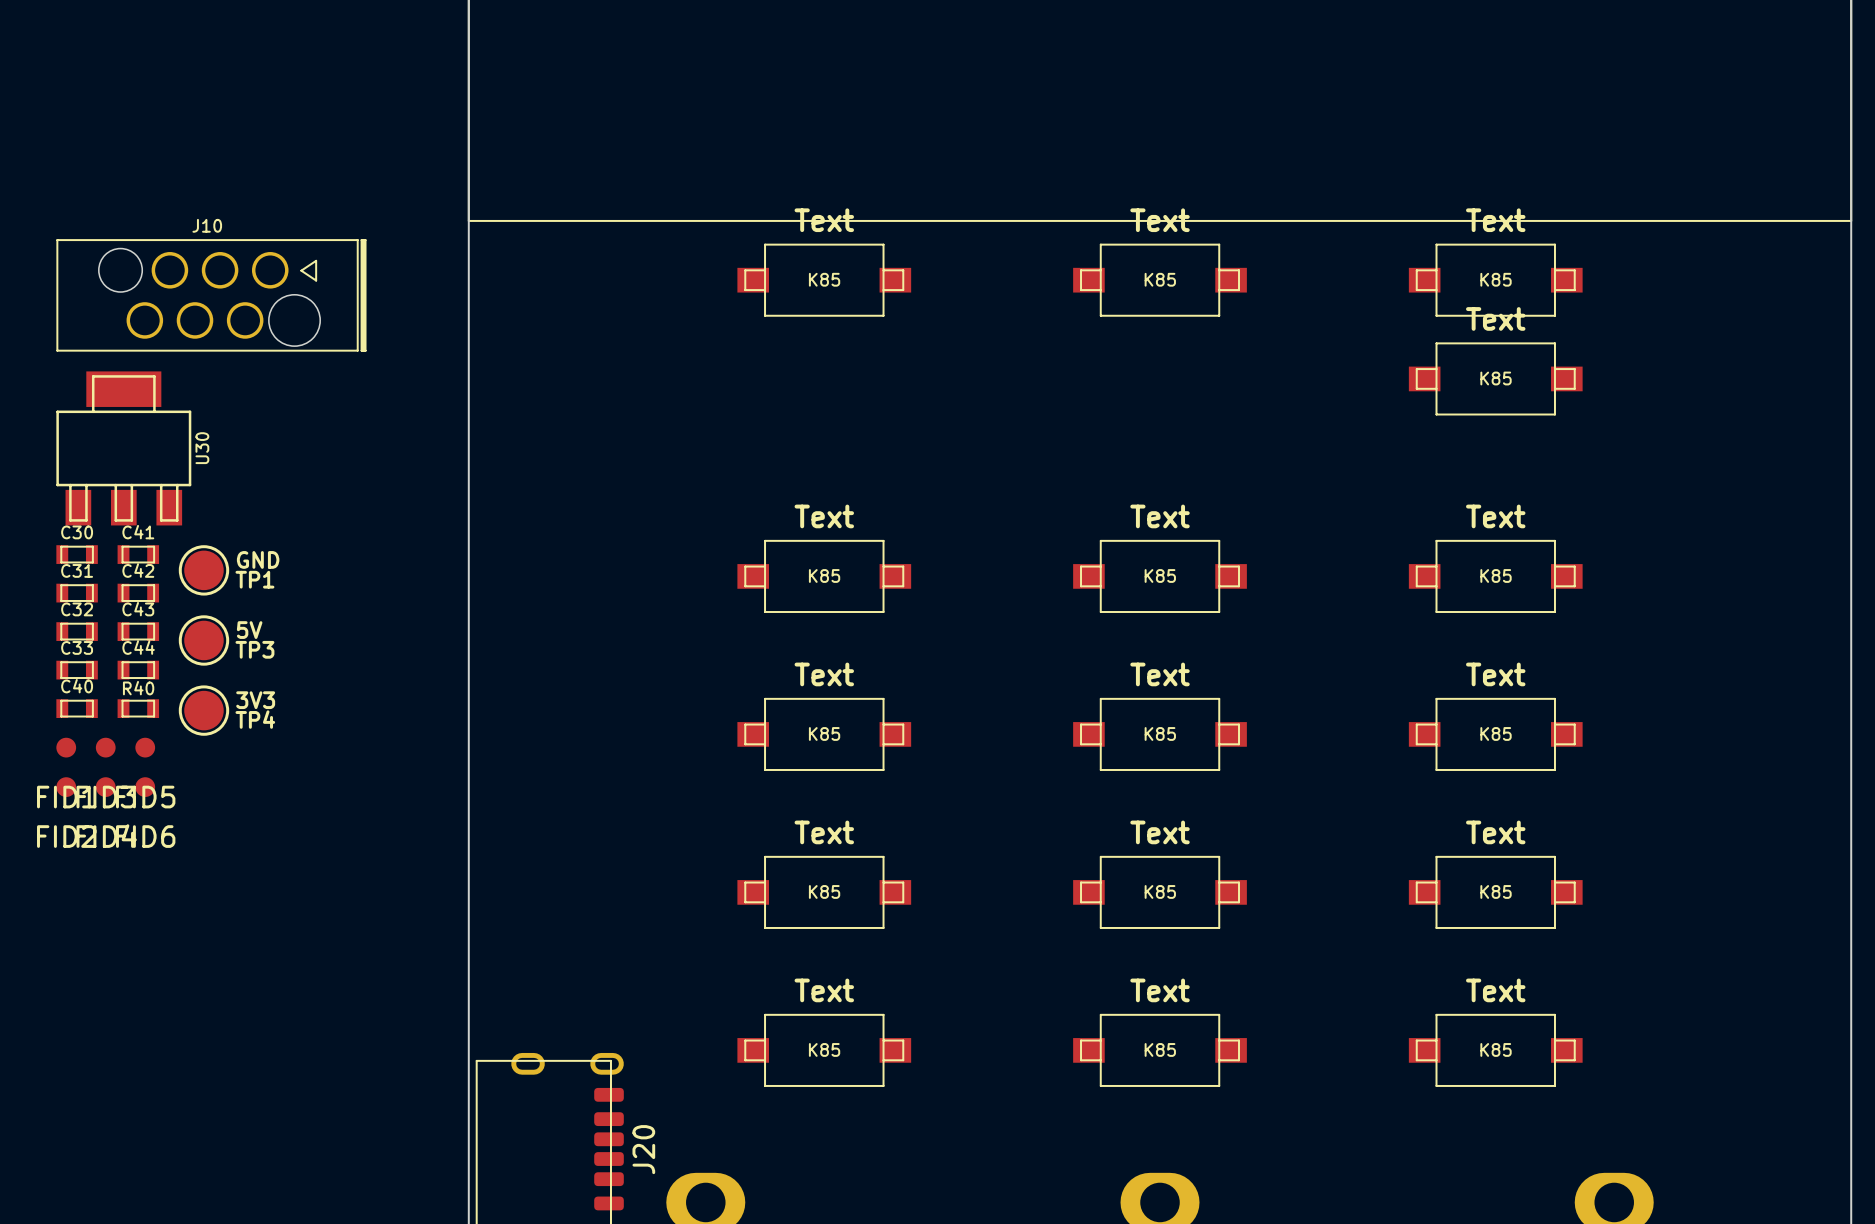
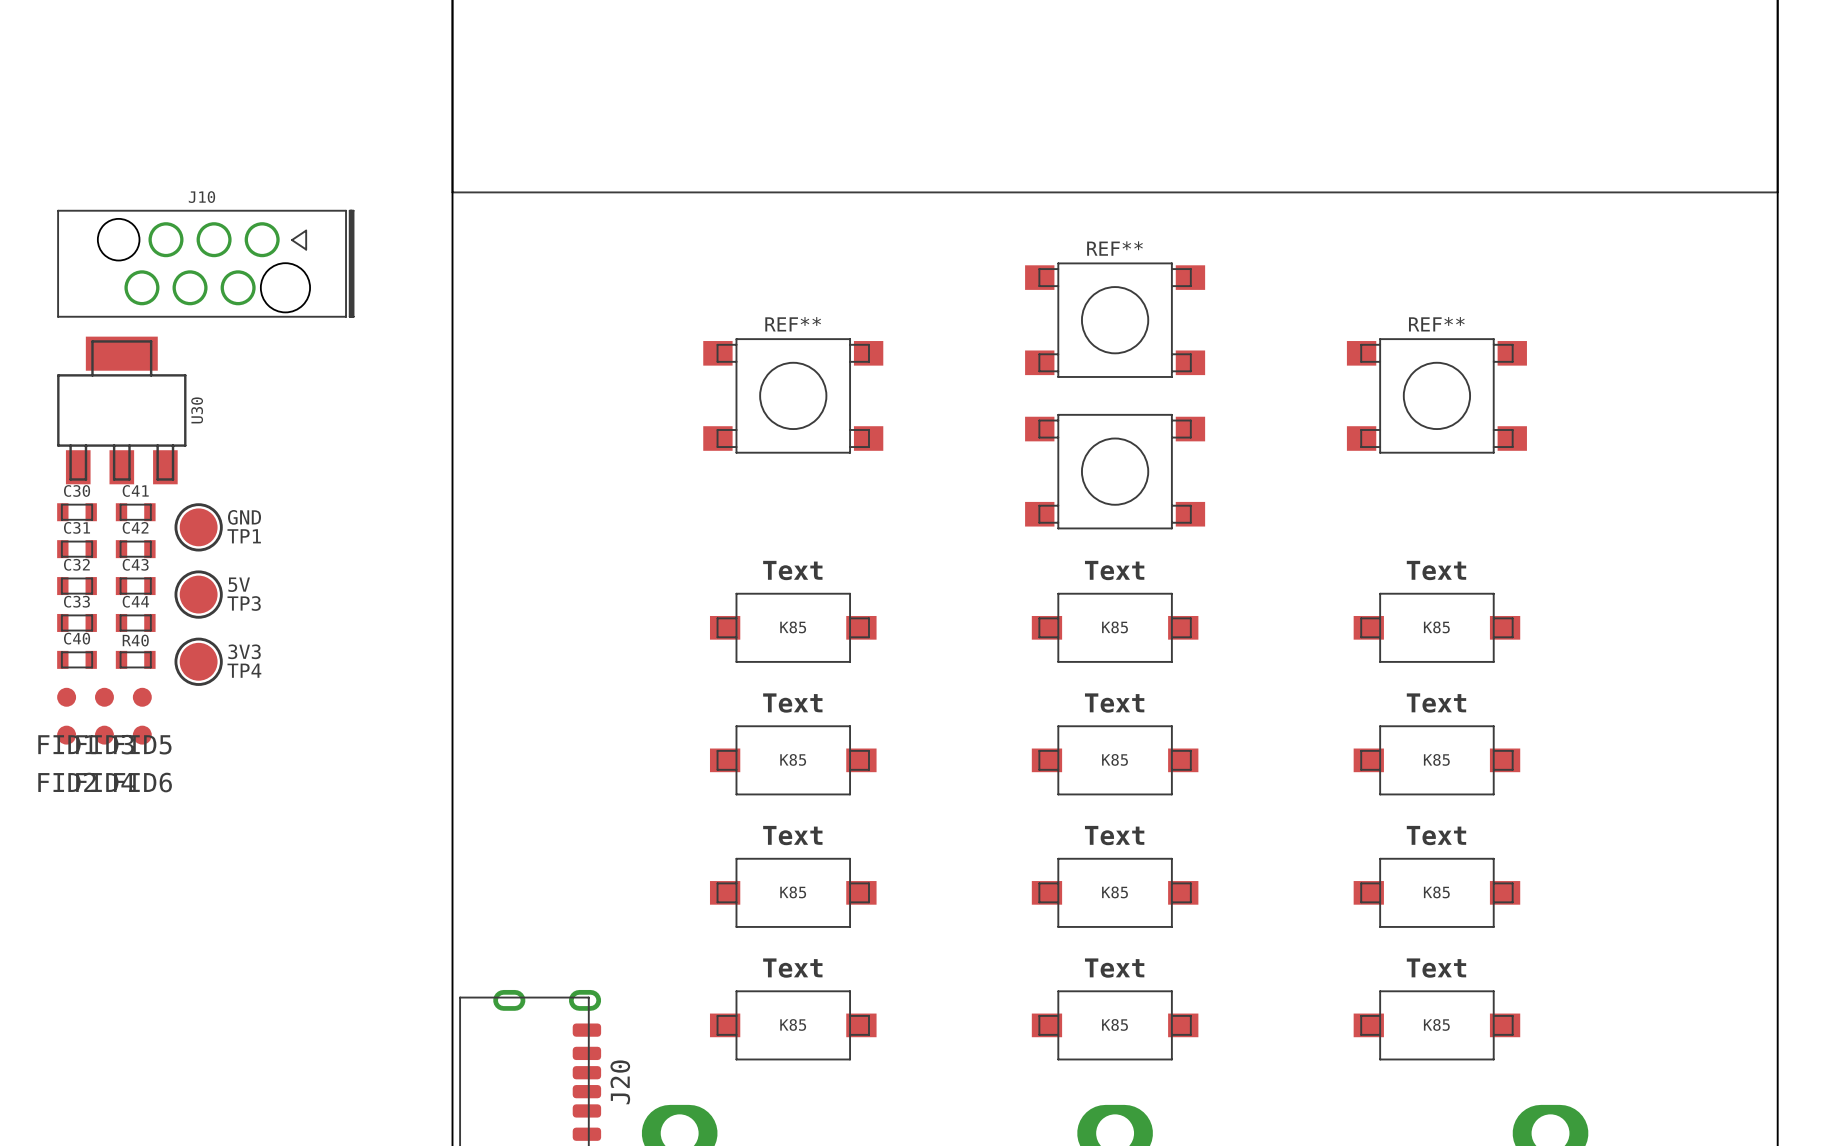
K85: (824, 280) -> none
K85: (1160, 280) -> none
K85: (1495, 280) -> none
REF**: none -> (1115, 320)
K85: (1495, 378) -> none
REF**: none -> (793, 395)
REF**: none -> (1436, 395)
part: none -> (1115, 471)
K85: (824, 576) -> none
K85: (1160, 576) -> none
K85: (1495, 576) -> none
K85: none -> (793, 627)
K85: none -> (1115, 627)
K85: none -> (1436, 627)
K85: (824, 734) -> none
K85: (1160, 734) -> none
K85: (1495, 734) -> none
K85: none -> (793, 760)
K85: none -> (1115, 760)
K85: none -> (1436, 760)
K85: (824, 892) -> none
K85: (1160, 892) -> none
K85: (1495, 892) -> none
K85: none -> (793, 892)
K85: none -> (1115, 892)
K85: none -> (1436, 892)
K85 position: (824, 1050) -> (793, 1025)
K85 position: (1160, 1050) -> (1115, 1025)
K85 position: (1495, 1050) -> (1436, 1025)

